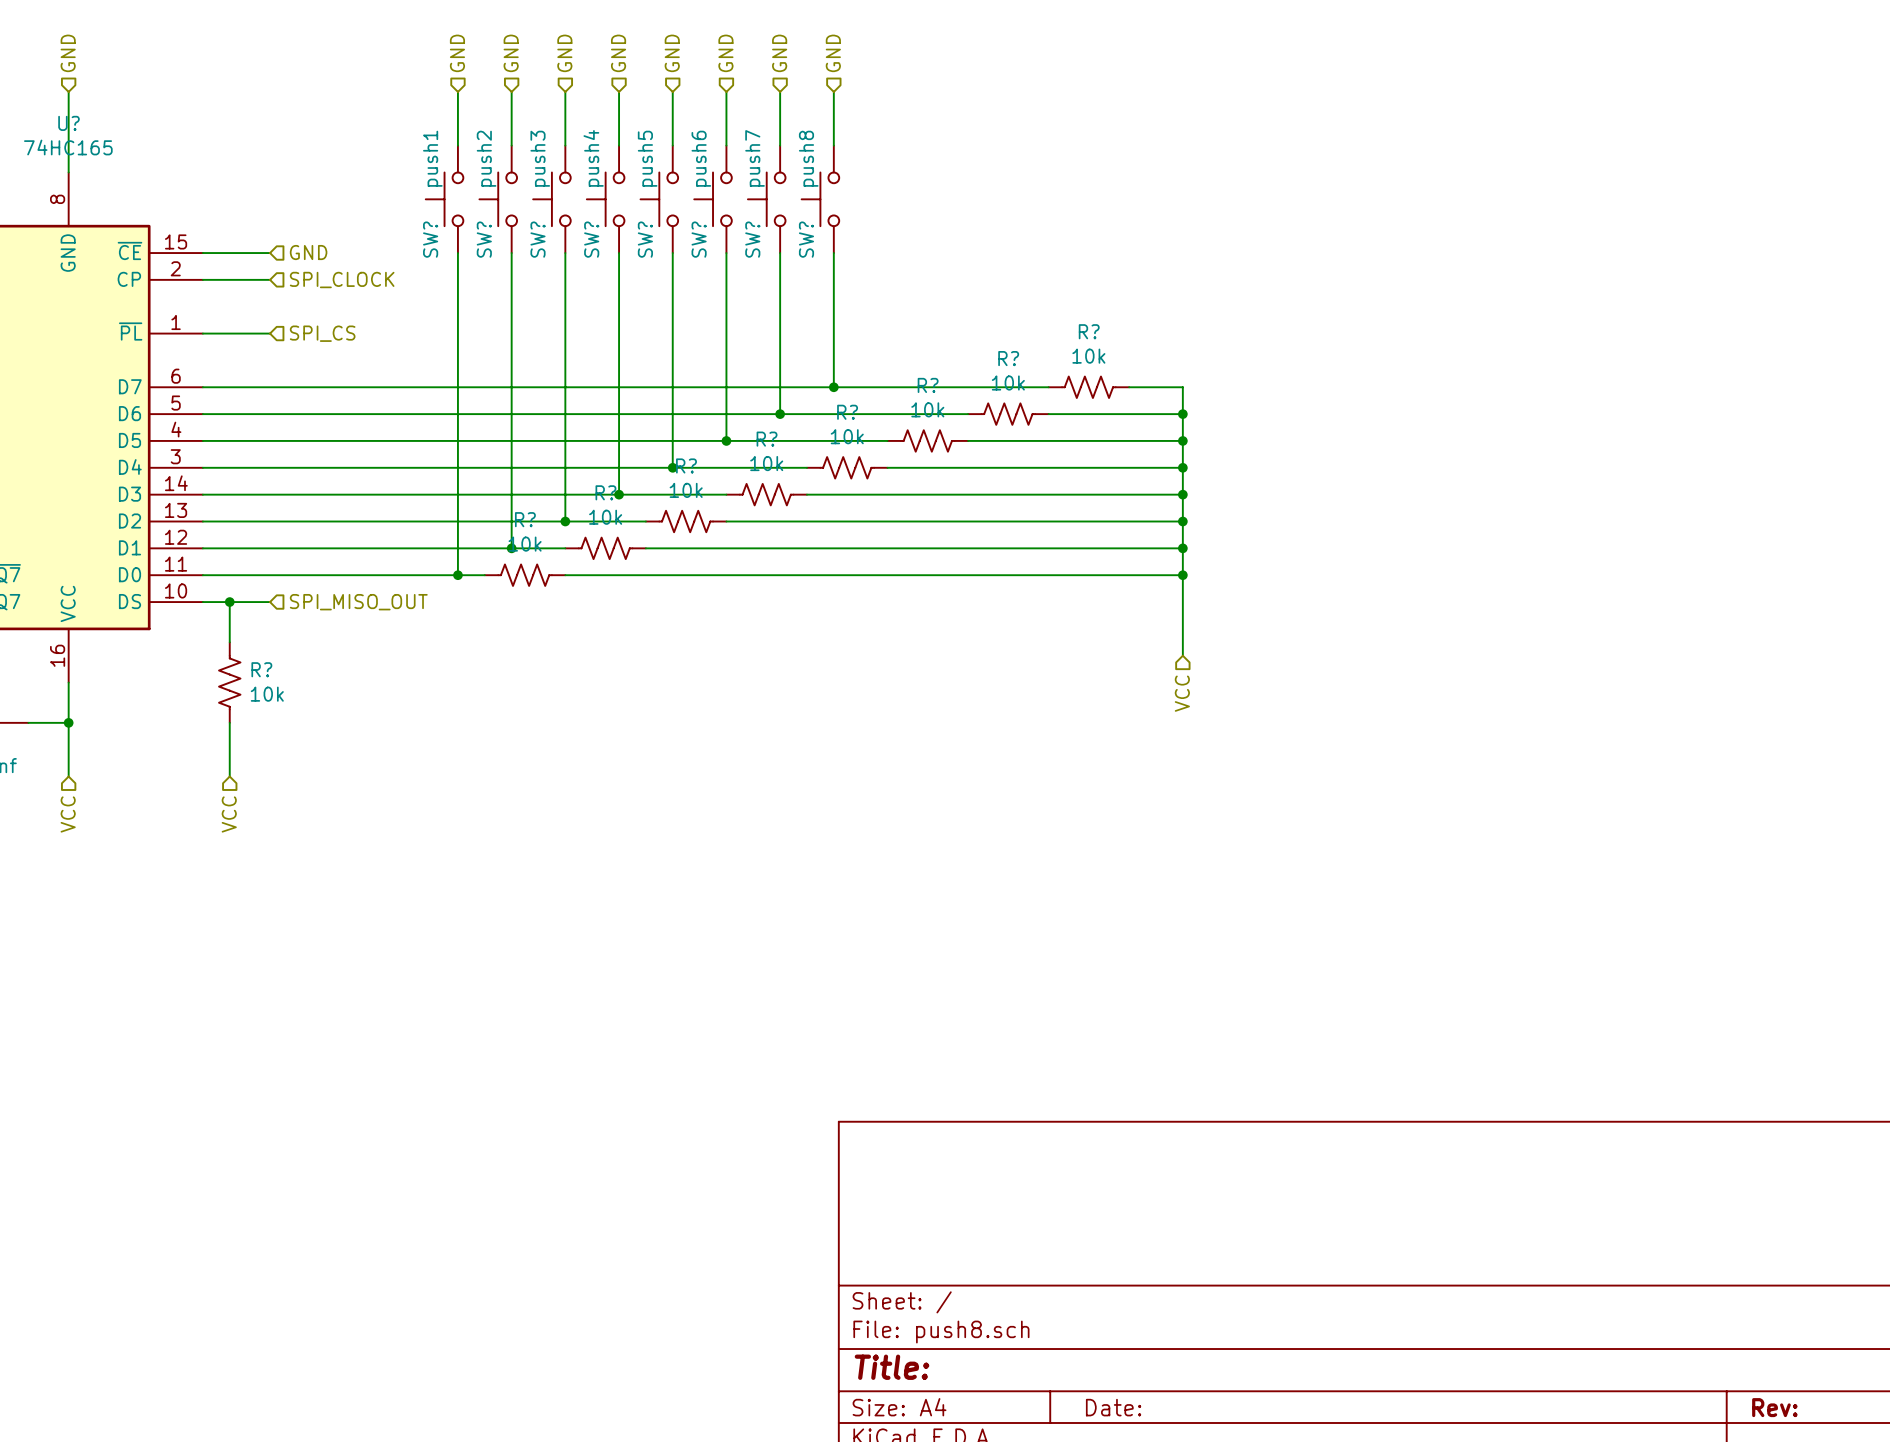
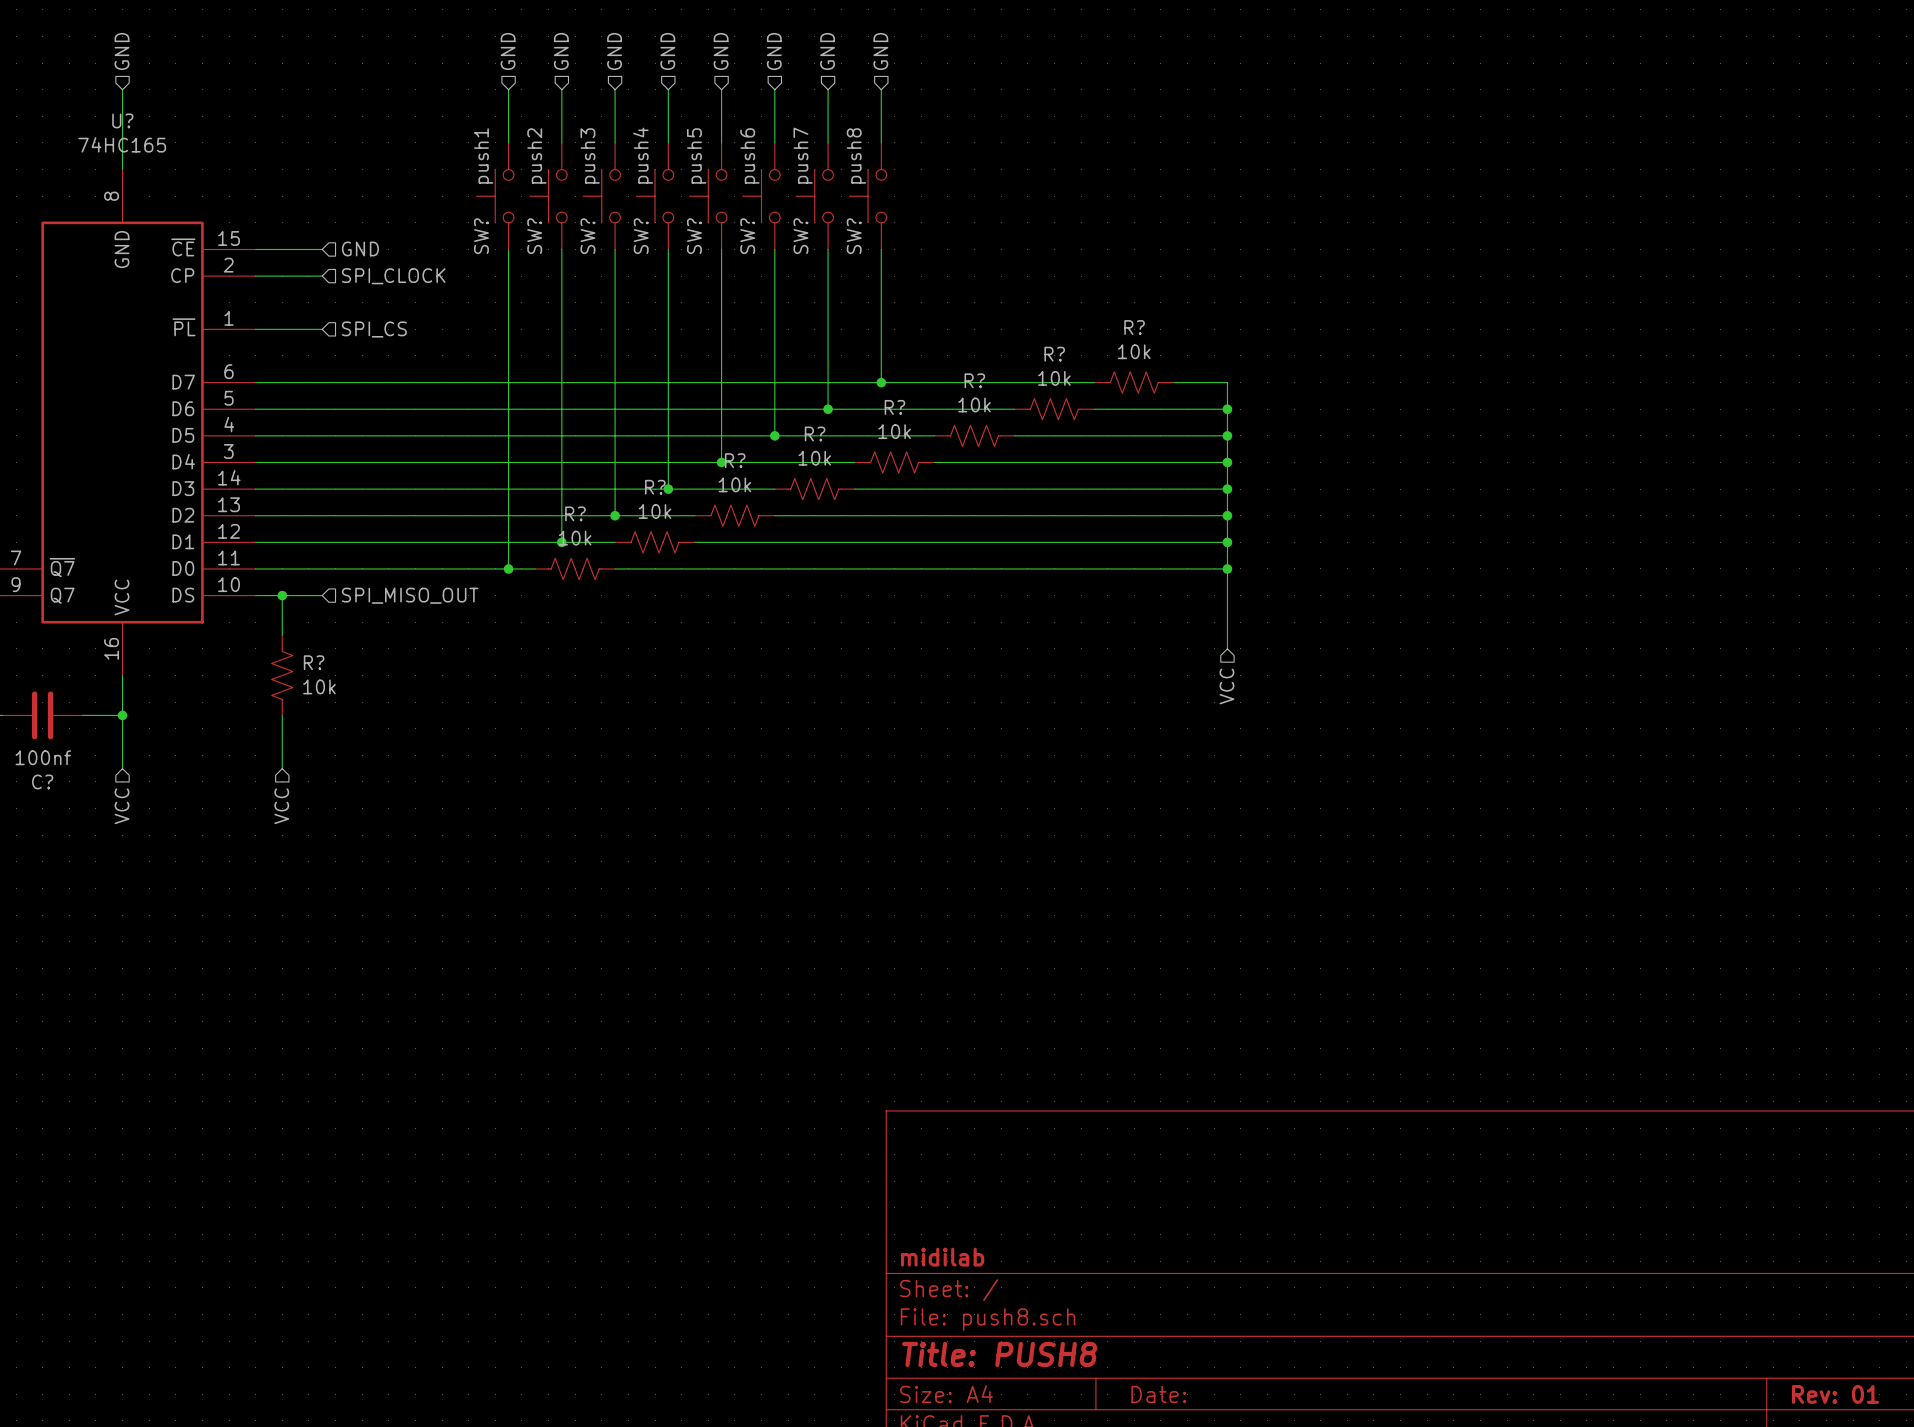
title block: none -> midilab (942, 1257)
title block: Title: (892, 1367) -> Title: PUSH8 (999, 1354)
title block: Rev: (1774, 1407) -> Rev: 01 (1835, 1394)

